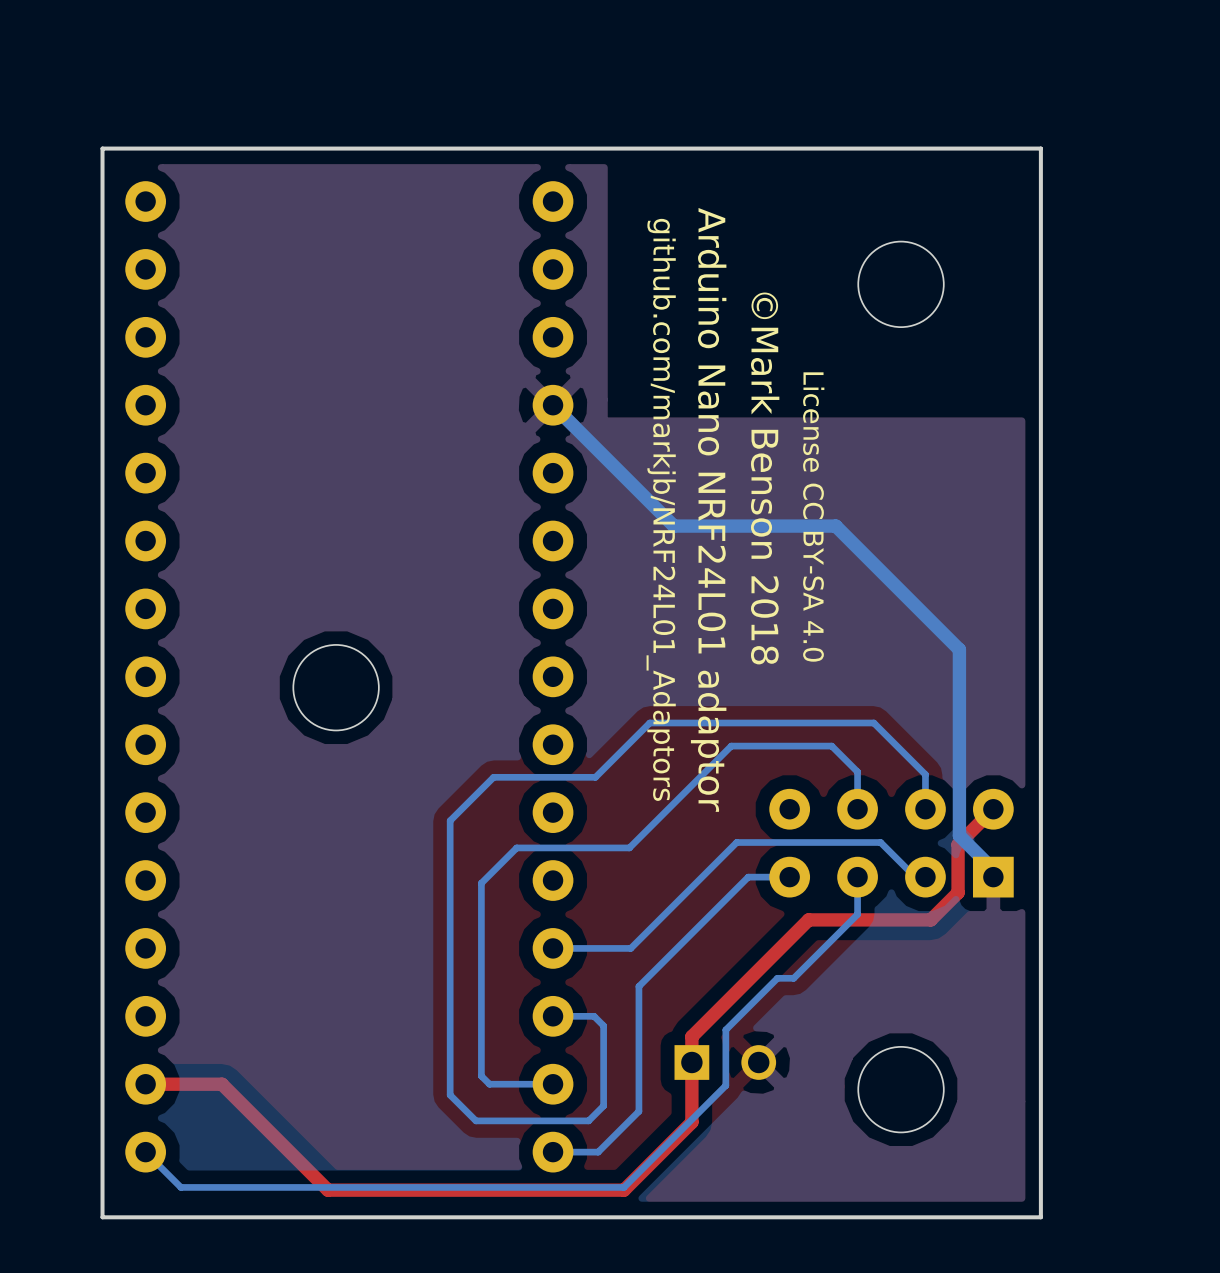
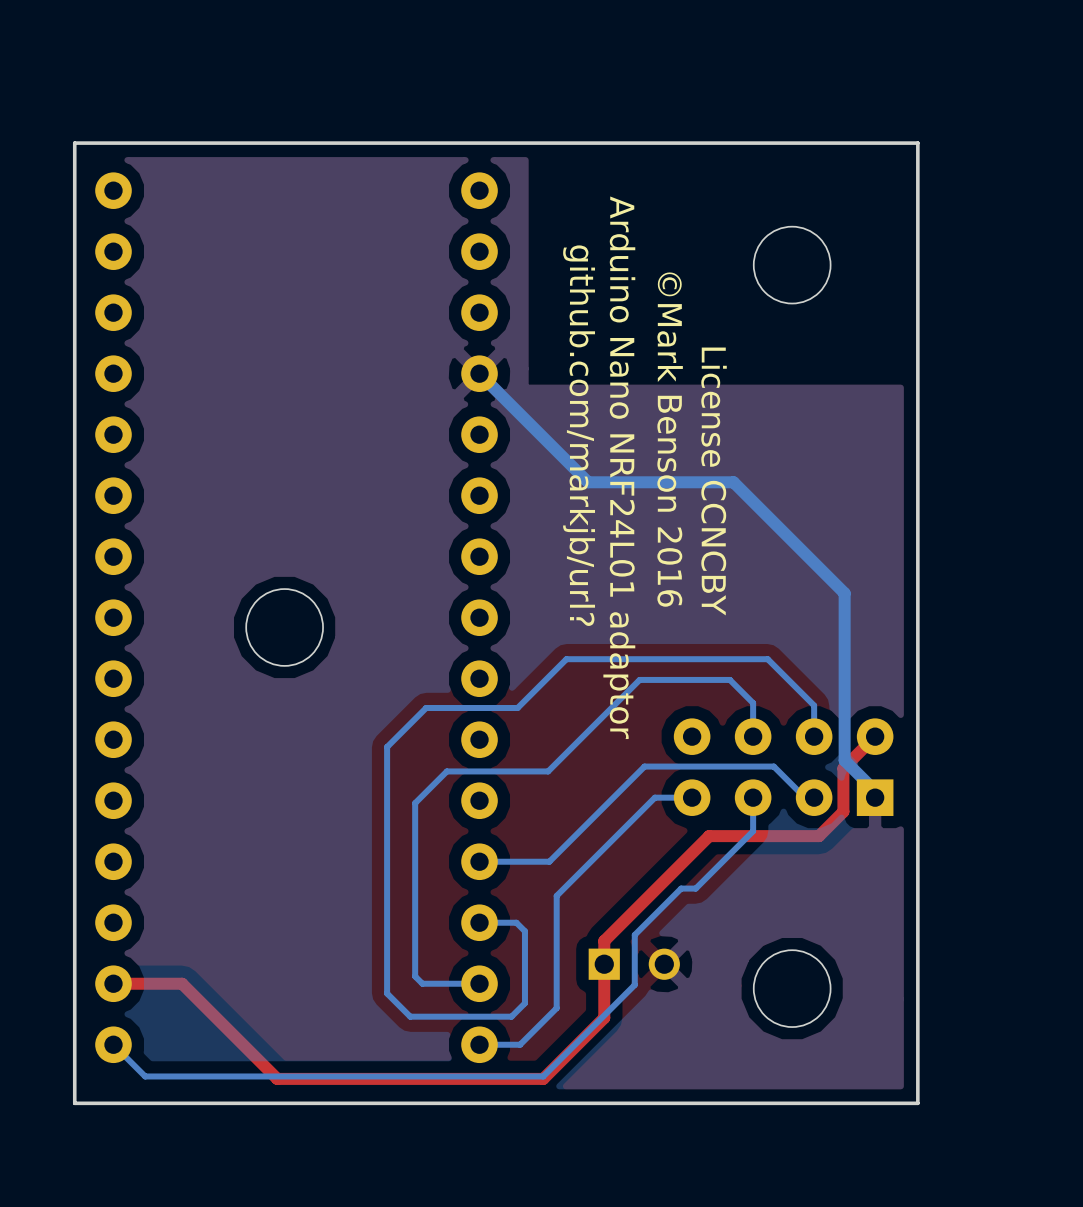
text: ©Mark Benson 2018 (765, 478) -> ©Mark Benson 2016 (670, 439)
text: github.com/markjb/NRF24L01_Adaptors (661, 509) -> github.com/markjb/url? (579, 435)
text: License CC BY-SA 4.0 (813, 517) -> License CCNCBY (714, 481)

